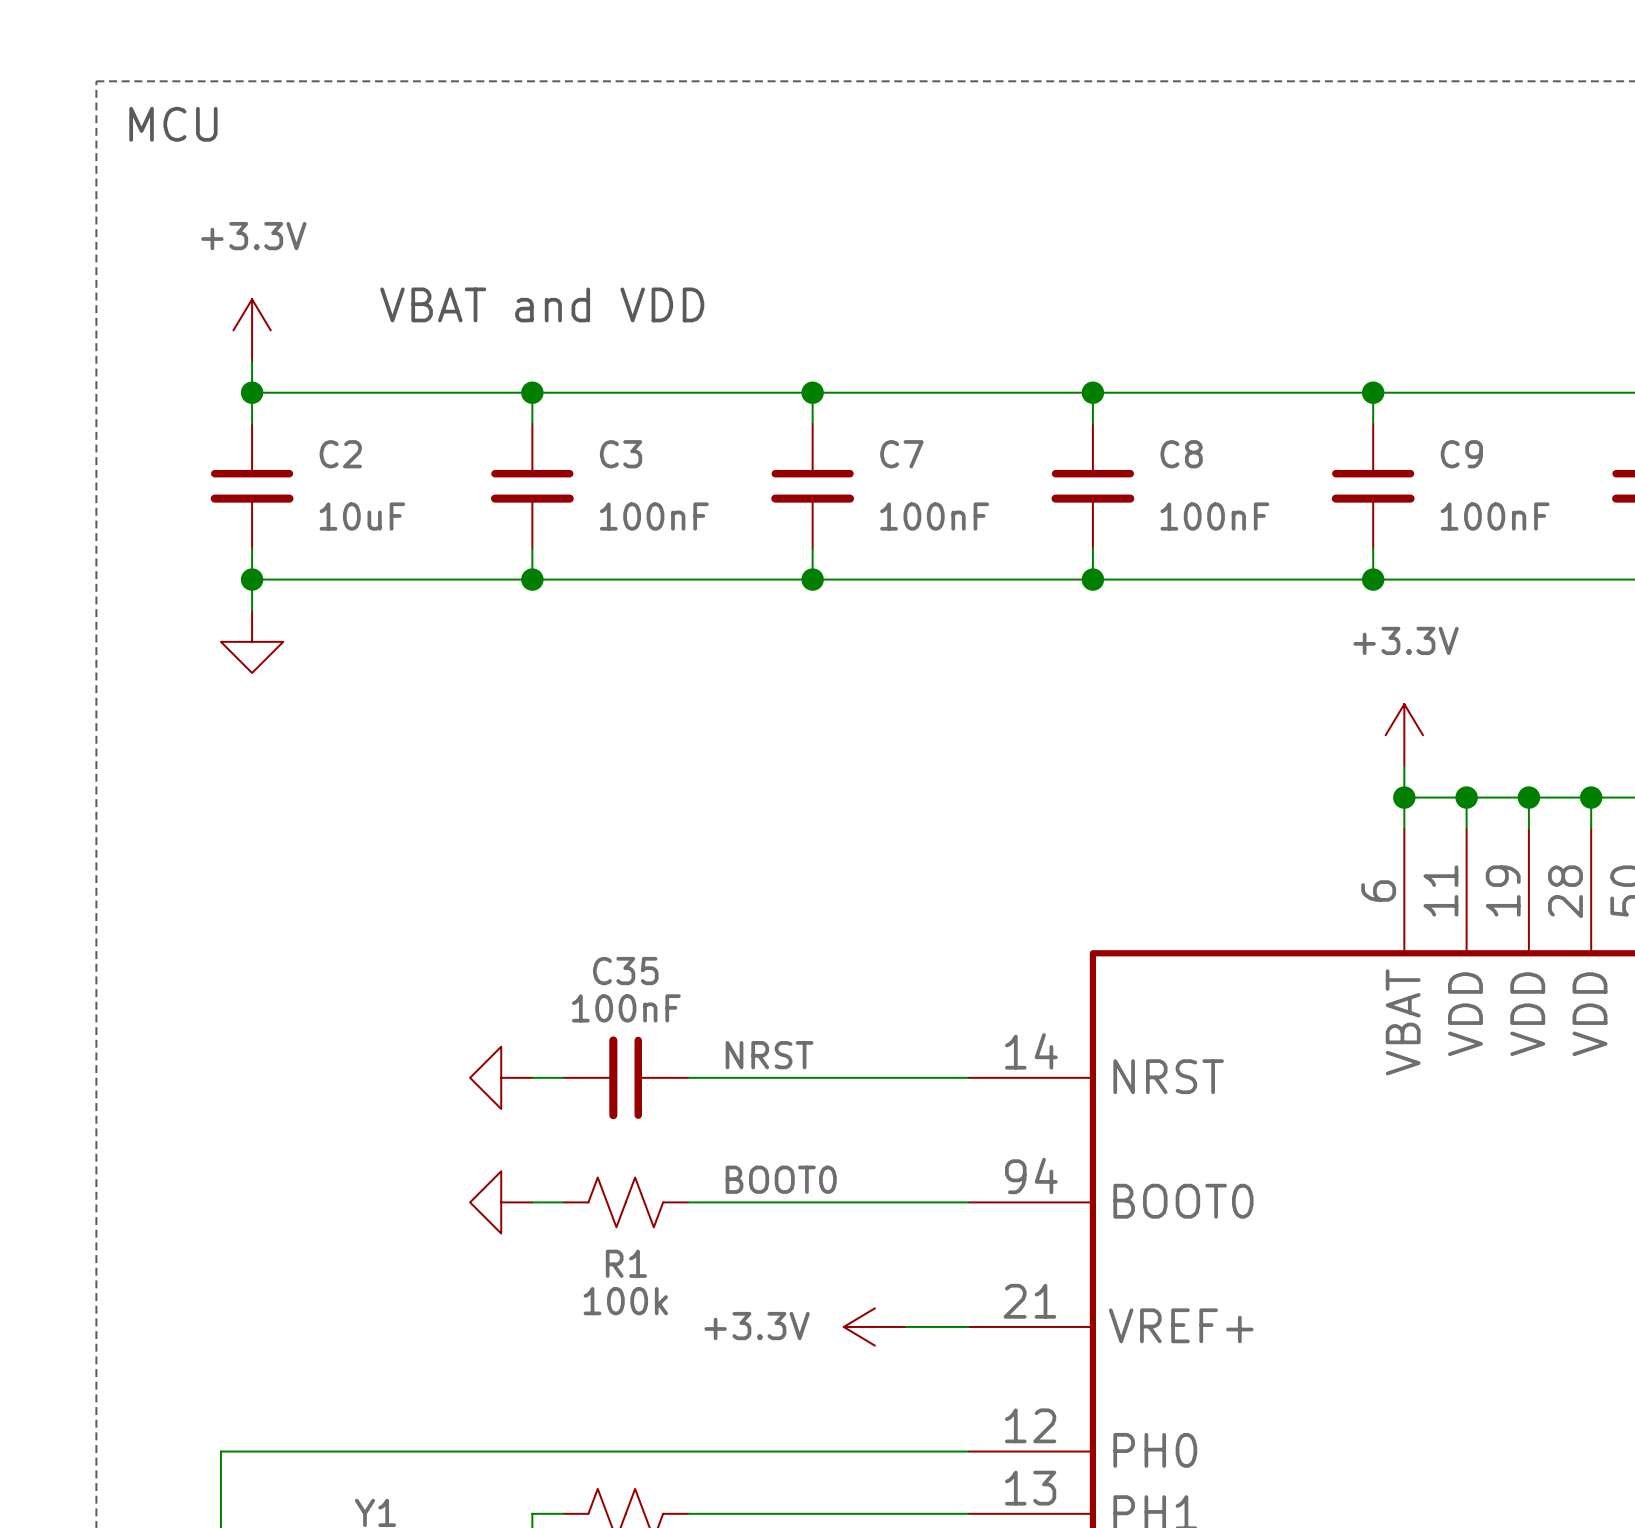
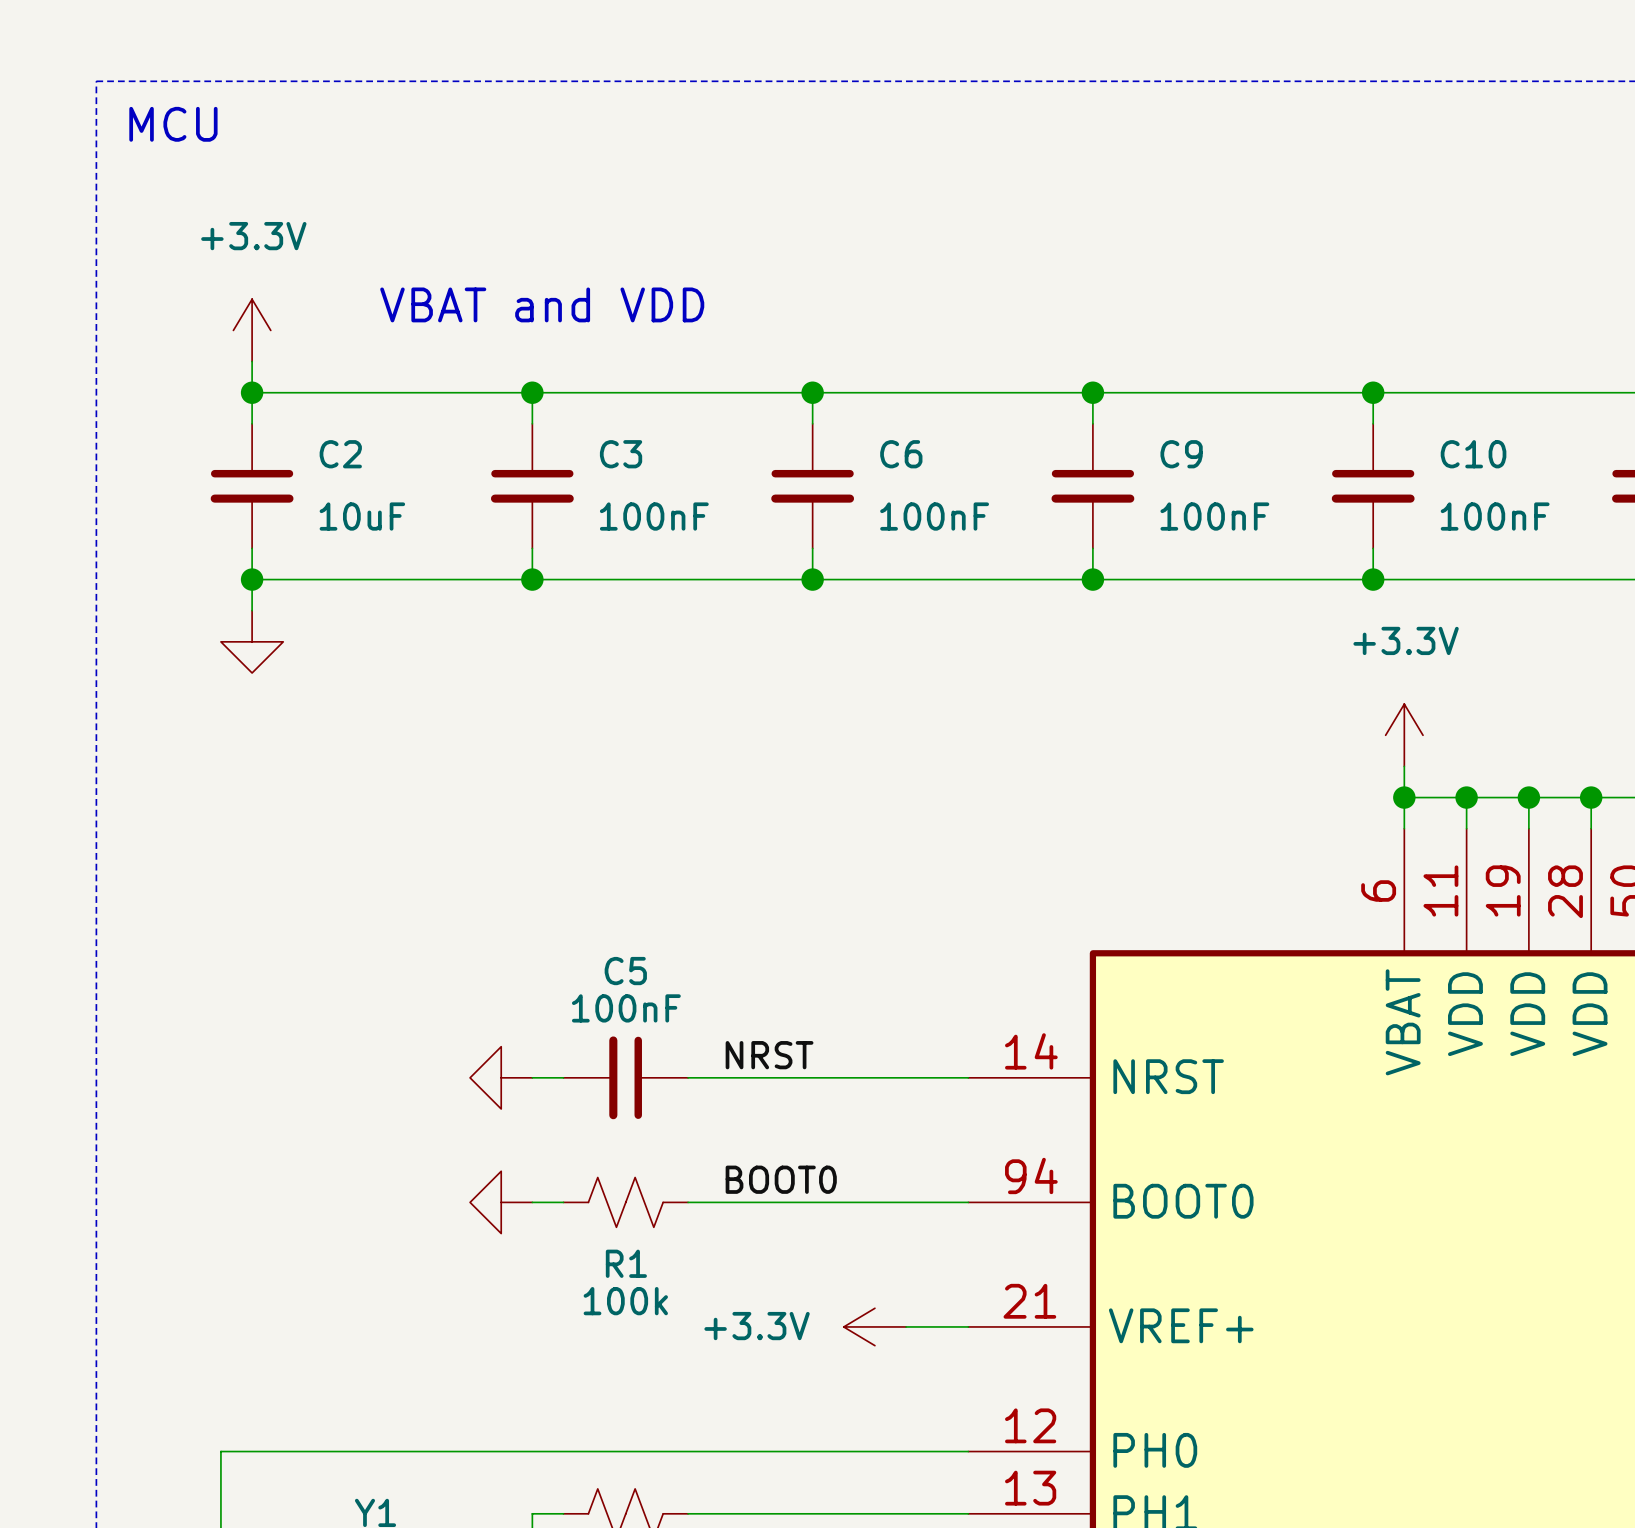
C7 name: C7 (901, 454) -> C6 (901, 454)
C8 name: C8 (1181, 454) -> C9 (1181, 454)
C9 name: C9 (1461, 454) -> C10 (1473, 454)
C35 name: C35 (625, 971) -> C5 (625, 971)

